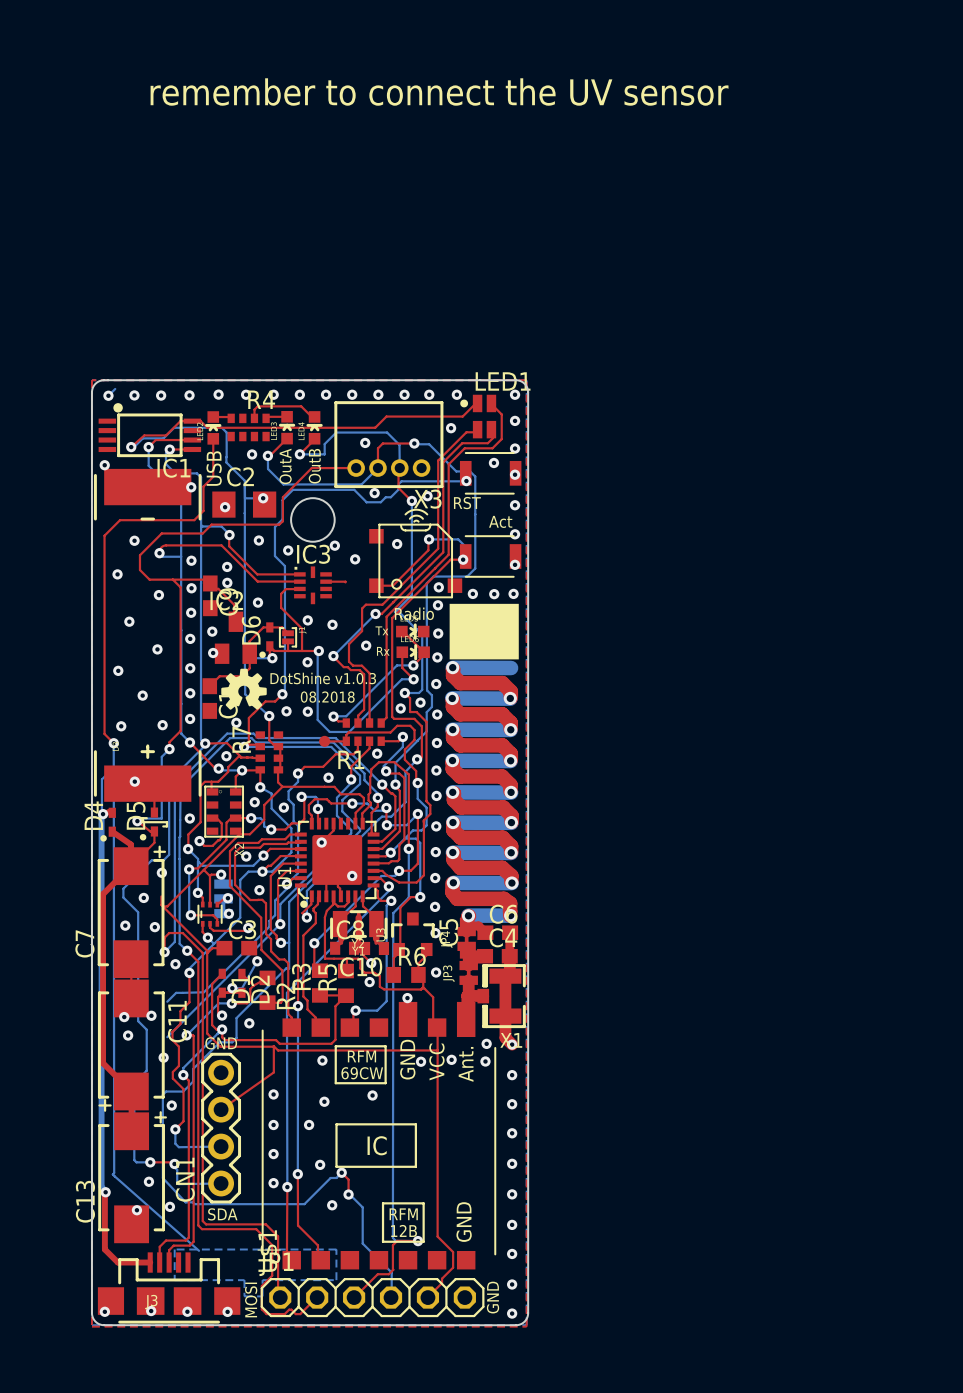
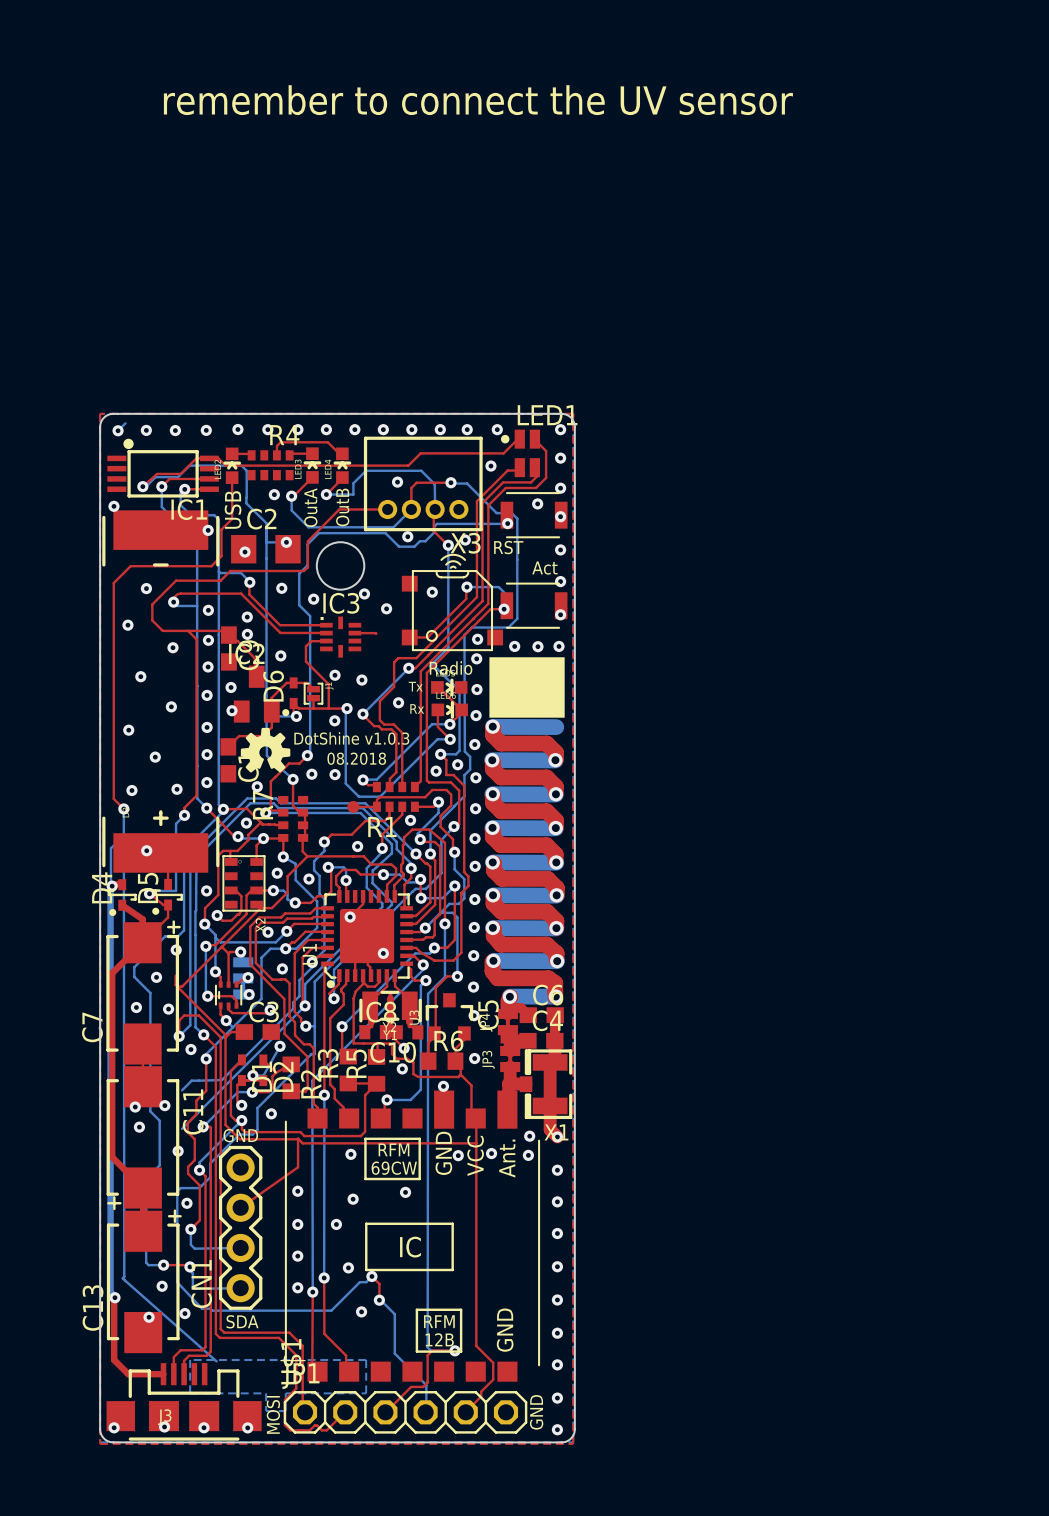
line: none -> (113, 890) (108, 890) (108, 894) (135, 894) (135, 899) (131, 899)

